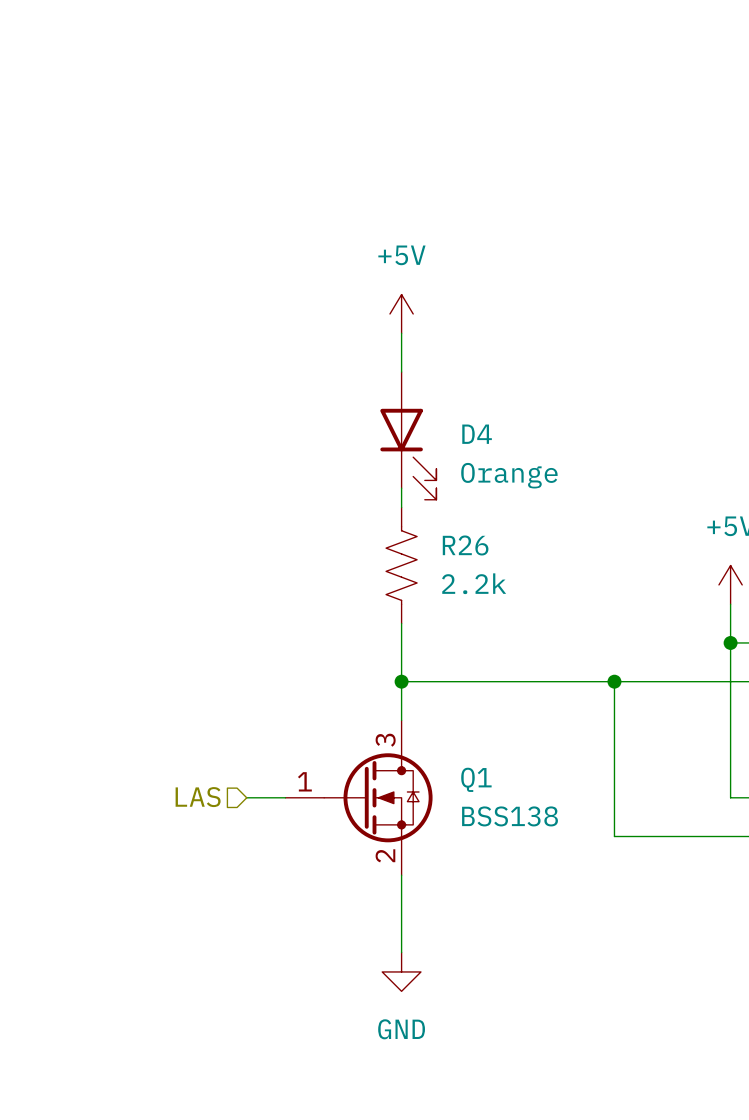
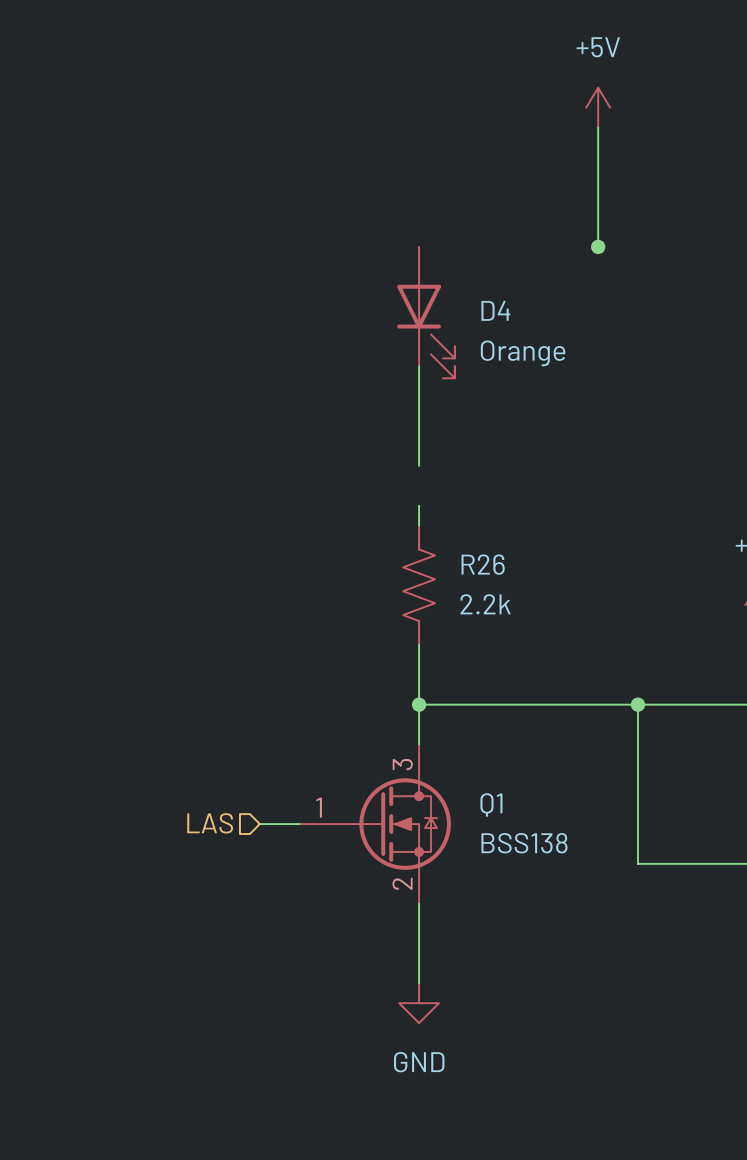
wire: none -> (598, 127) (598, 246)
junction: none -> (598, 246)
power symbol position: +5V (401, 313) -> +5V (598, 107)
D4 position: (408, 435) -> (426, 312)

